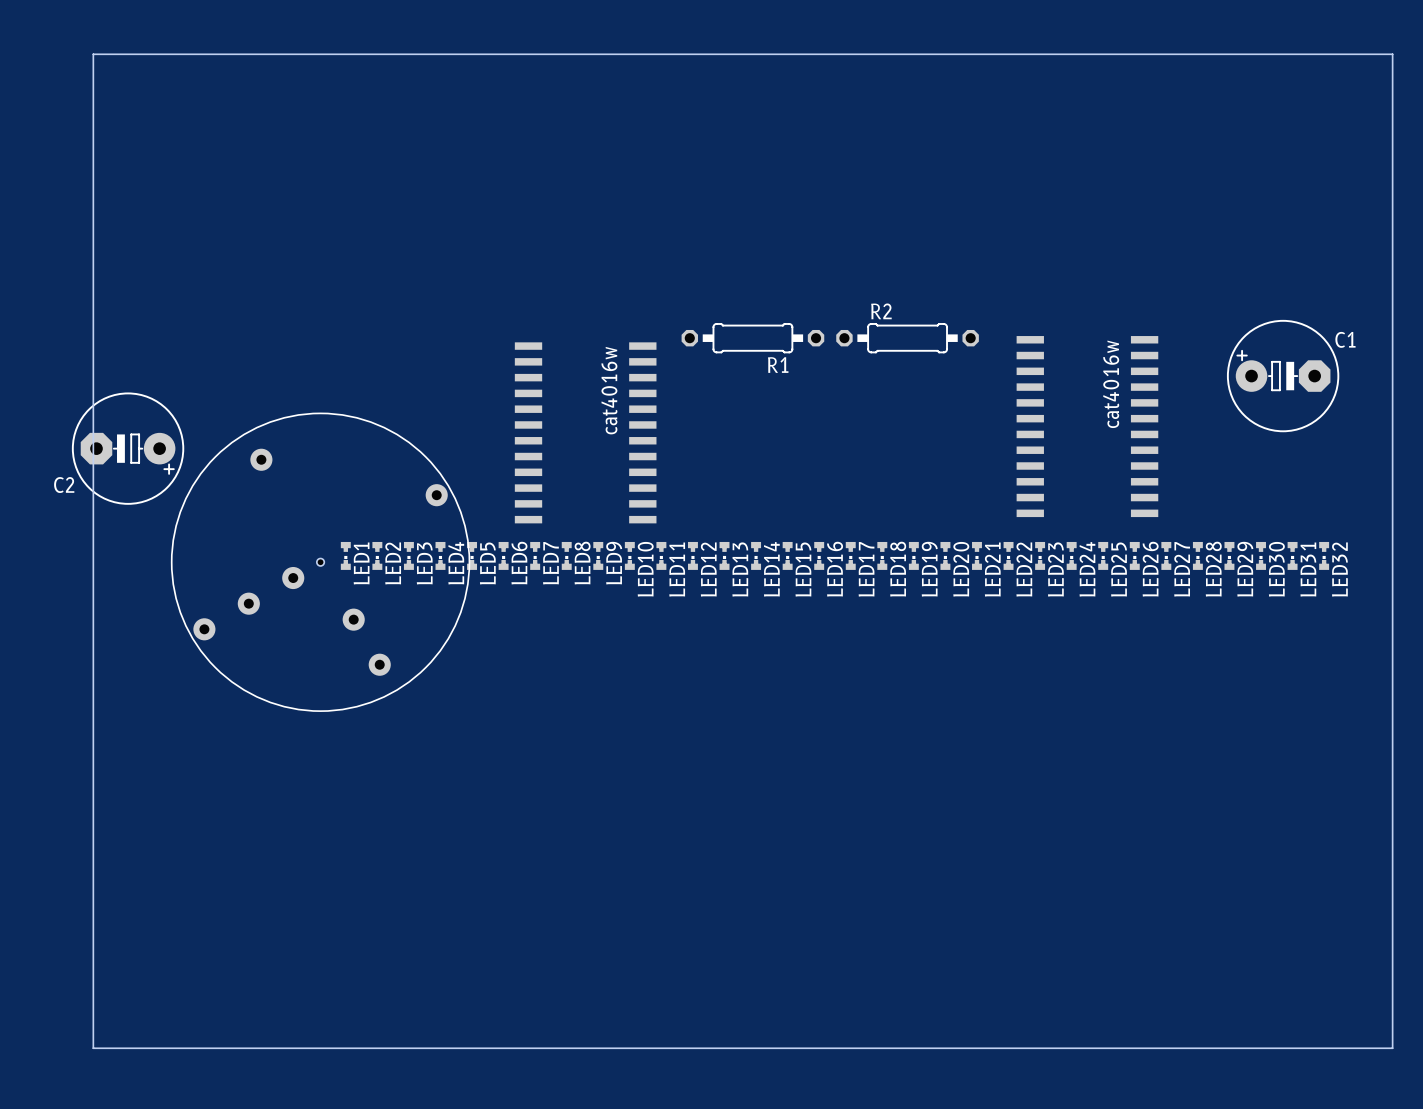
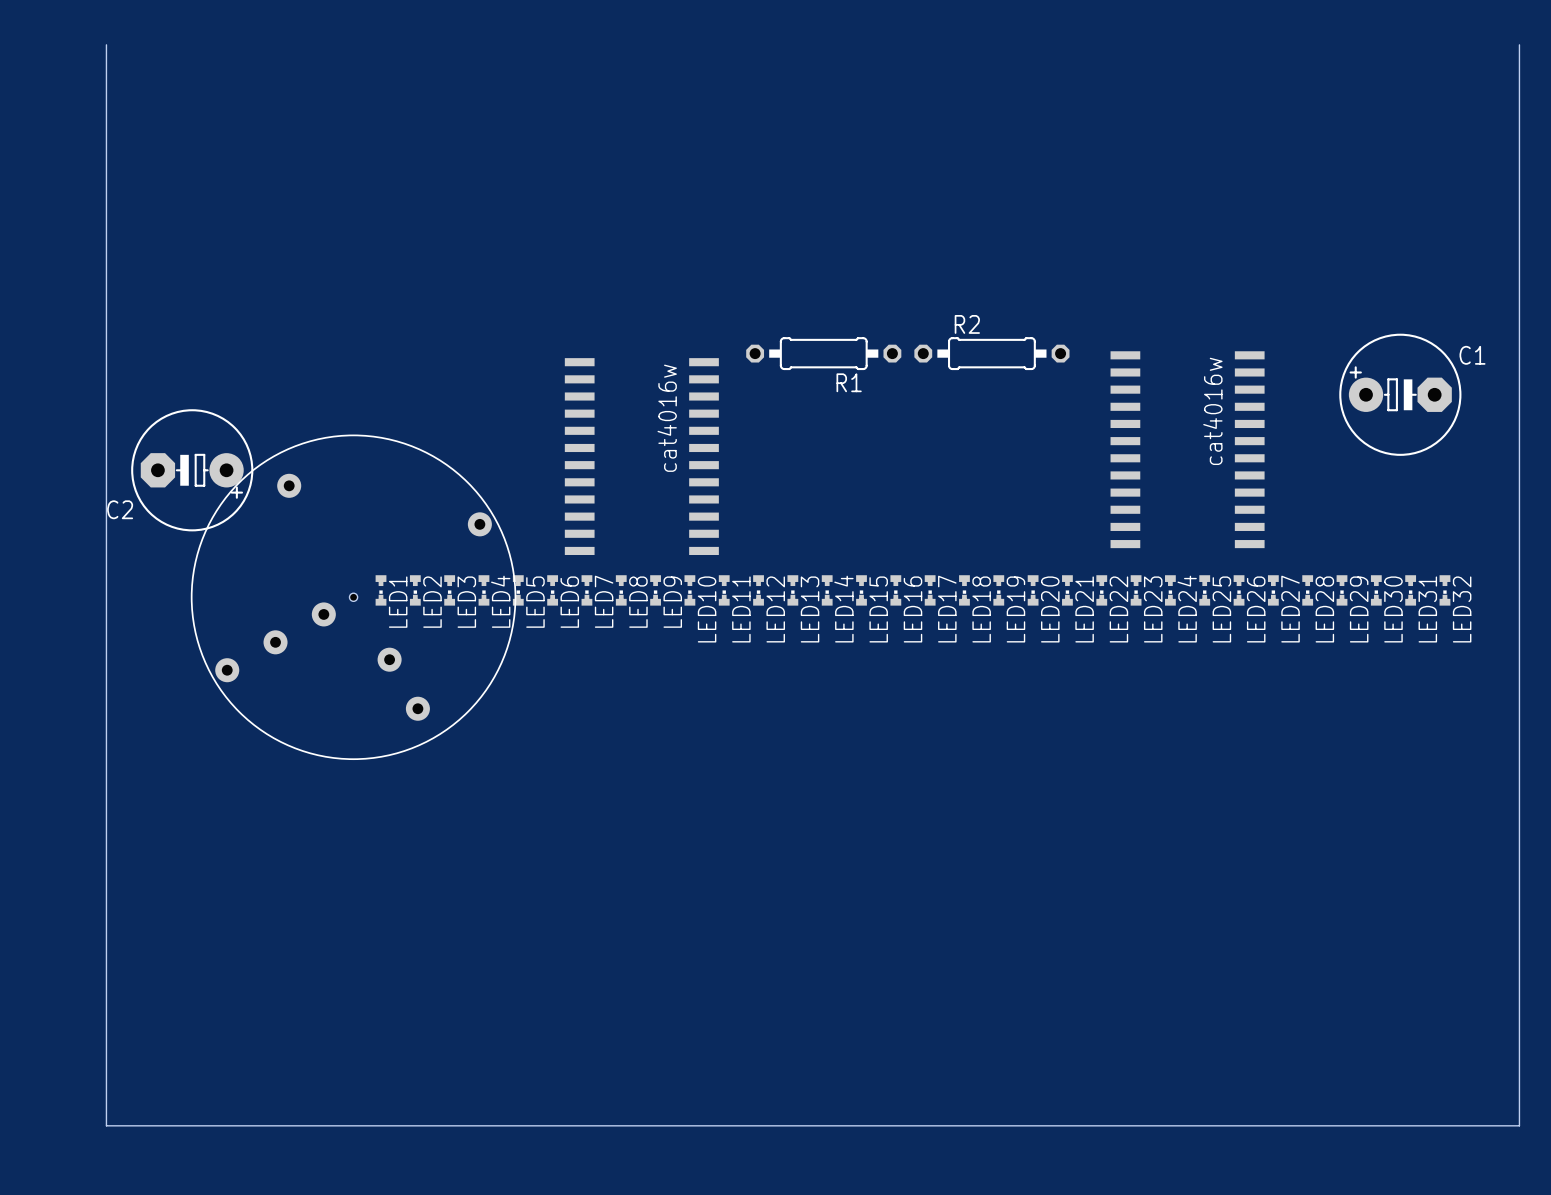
board edge: (93, 54) (1392, 54) -> none
C2 position: (128, 448) -> (192, 470)

